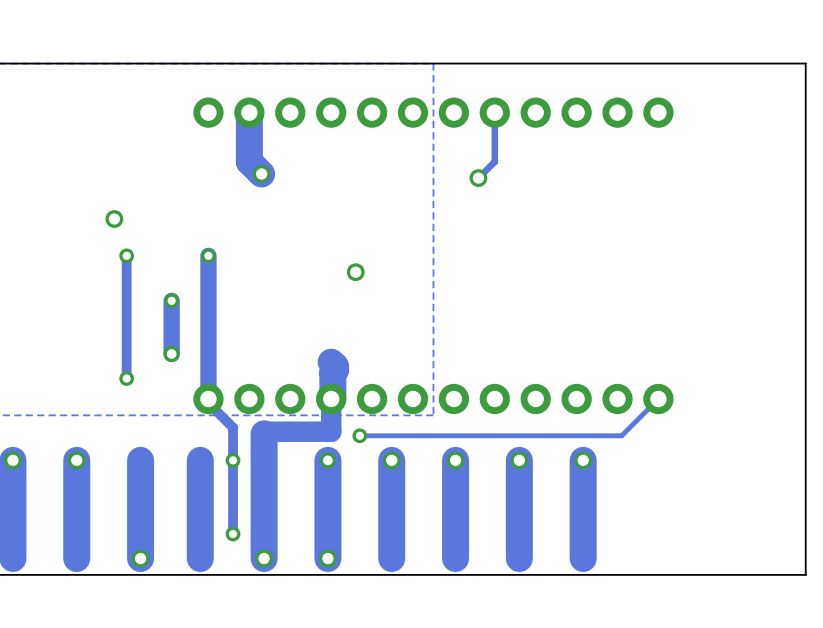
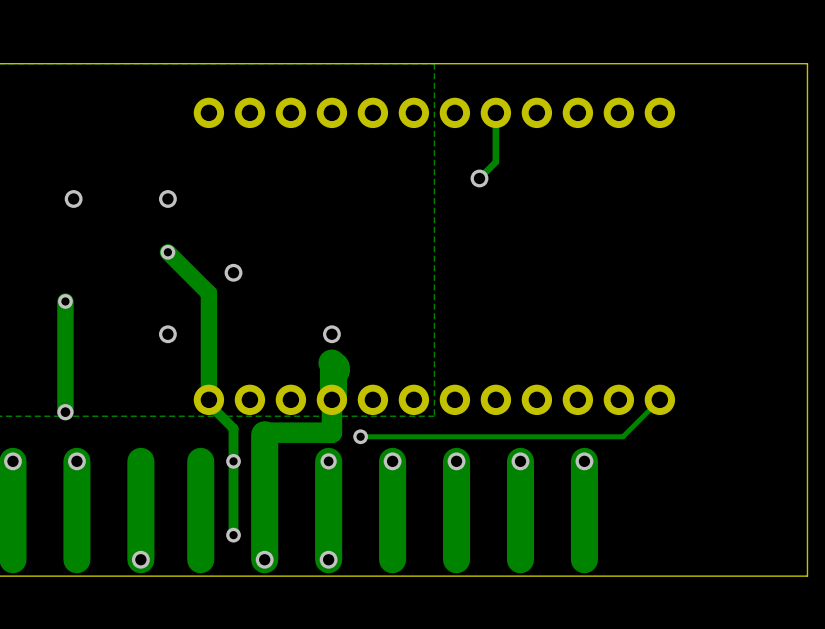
track: (249, 112) (249, 161) (261, 174) -> none
via: (261, 174) -> none
via: none -> (73, 198)
via: none -> (167, 198)
via: (114, 219) -> none
via: none -> (167, 252)
track: (126, 255) (126, 378) -> none
via: (126, 255) -> none
track: (208, 255) (208, 292) -> (167, 252) (208, 293)
via: (208, 255) -> none
via: none -> (233, 272)
via: (355, 272) -> none
track: none -> (65, 301) (65, 412)
via: none -> (65, 301)
track: (171, 300) (171, 353) -> none
via: (171, 300) -> none
via: none -> (167, 334)
via: none -> (331, 334)
via: (171, 353) -> none
via: (126, 378) -> none
via: none -> (65, 412)

